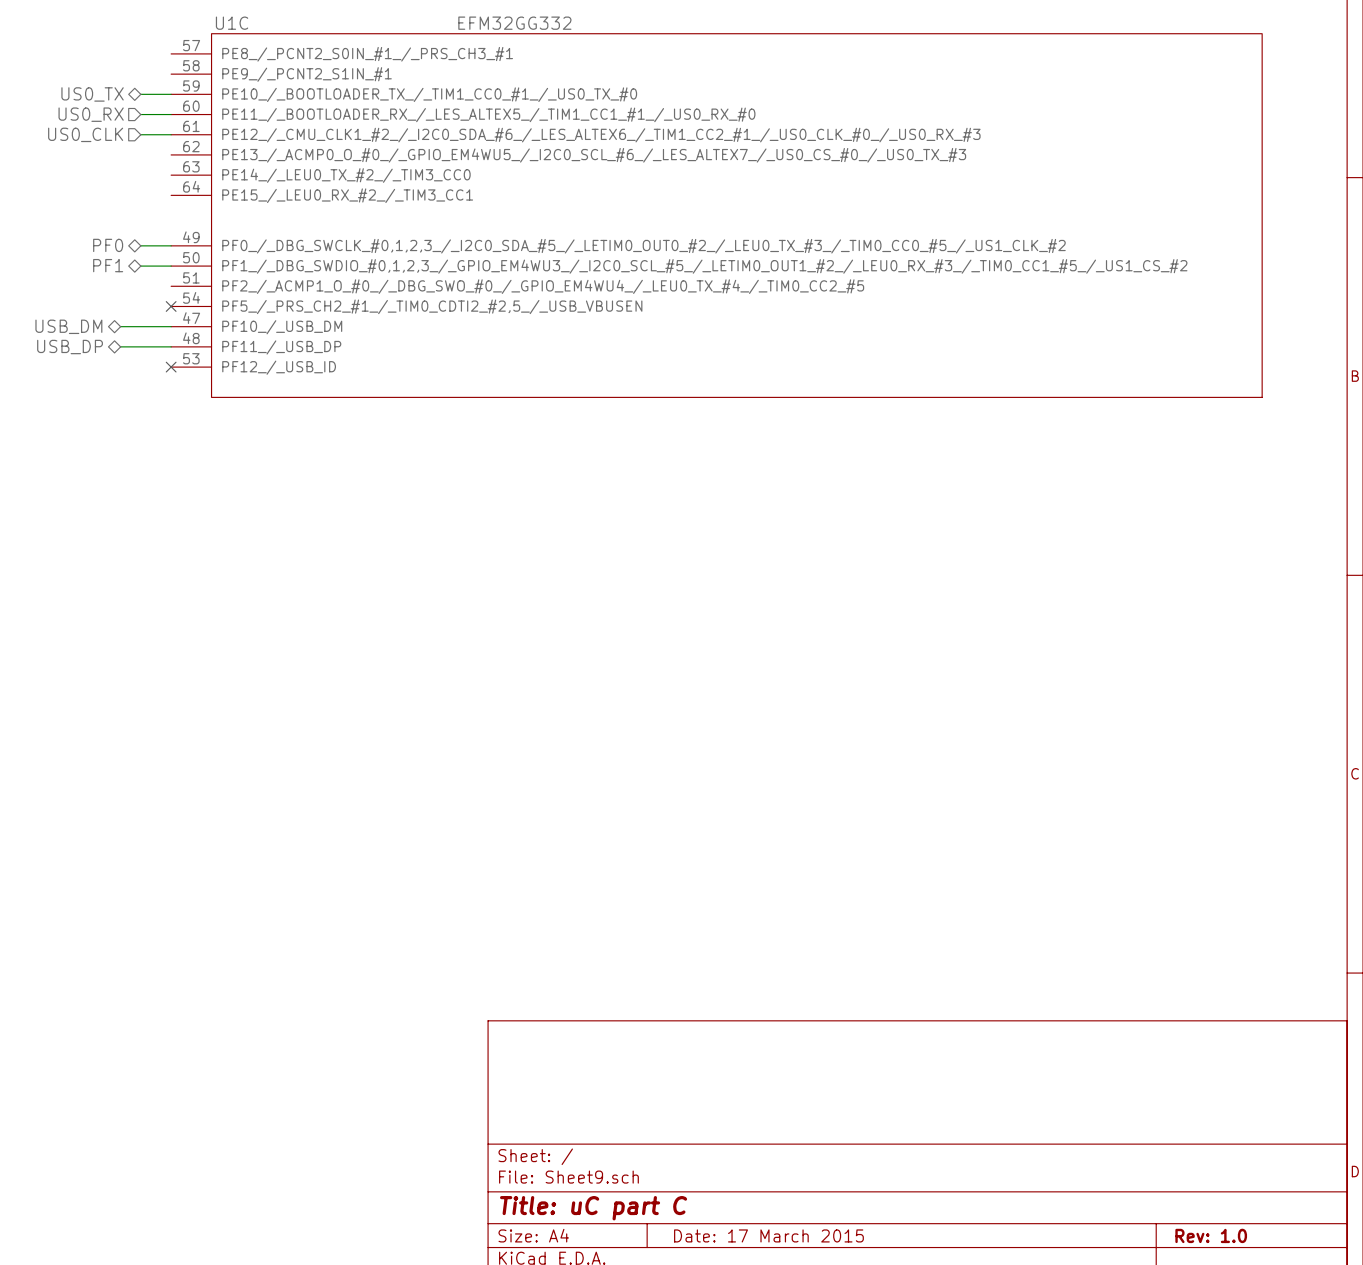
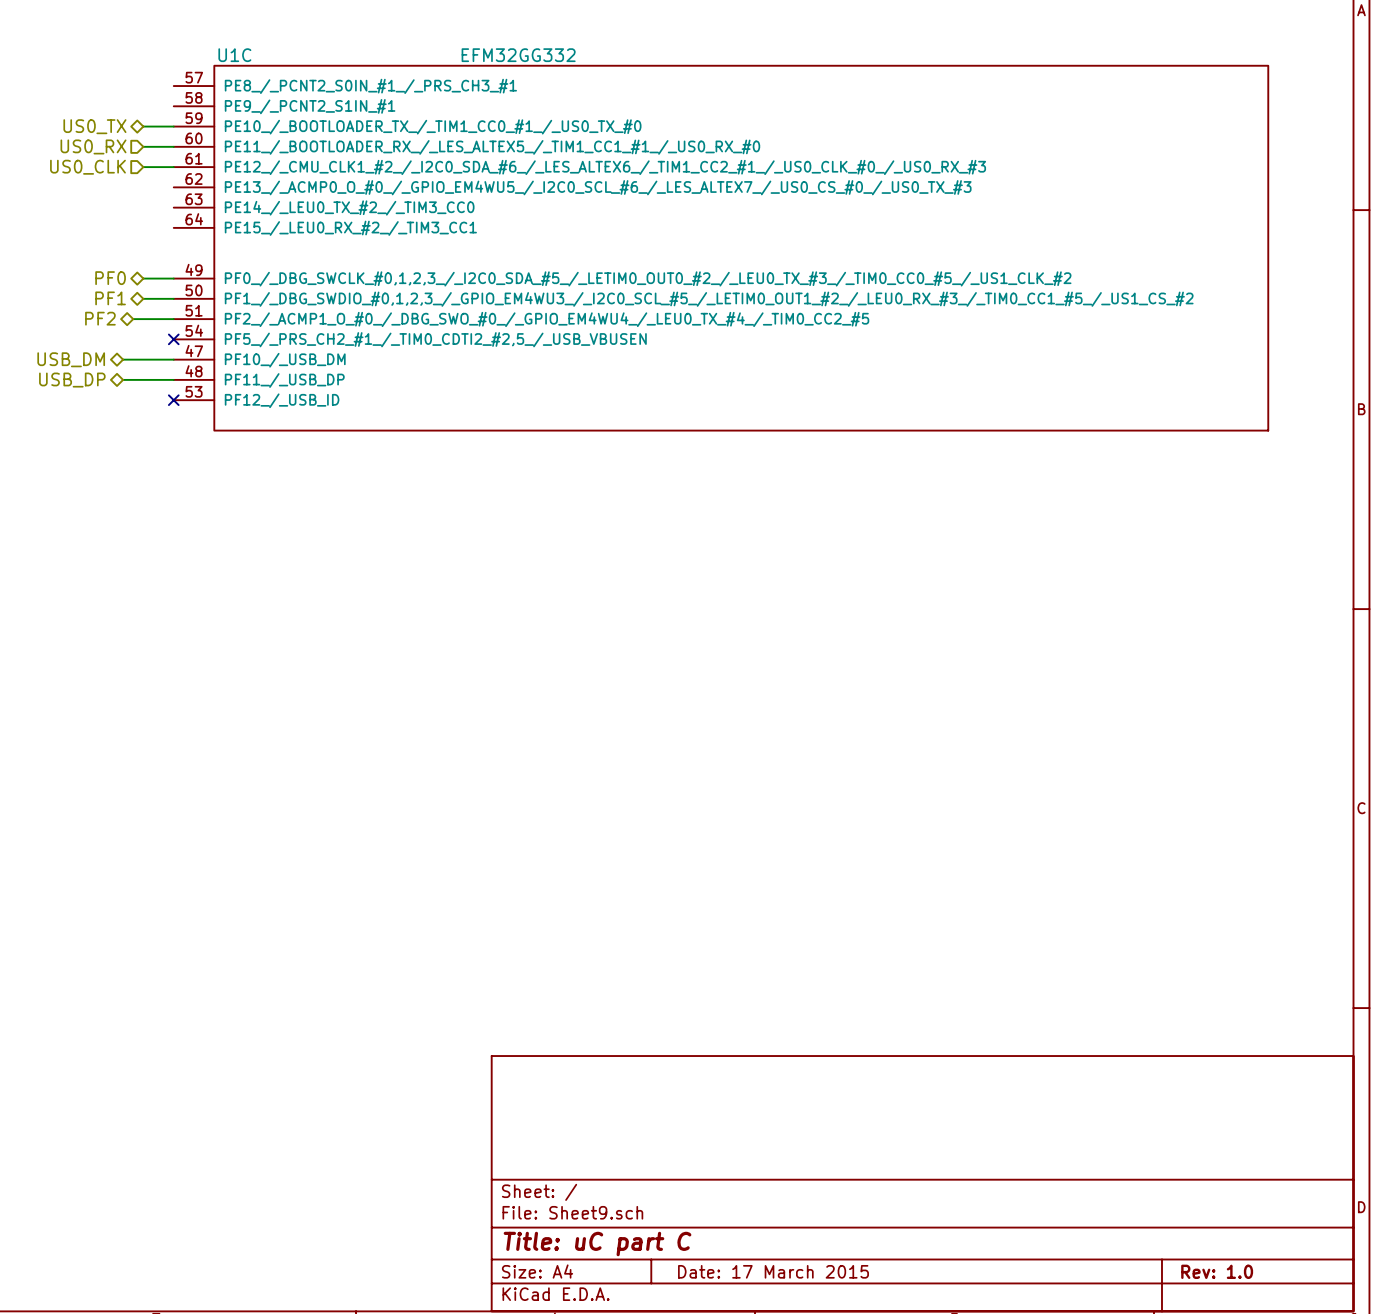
hierarchical label: none -> PF2 (100, 318)
wire: none -> (133, 319) (173, 319)

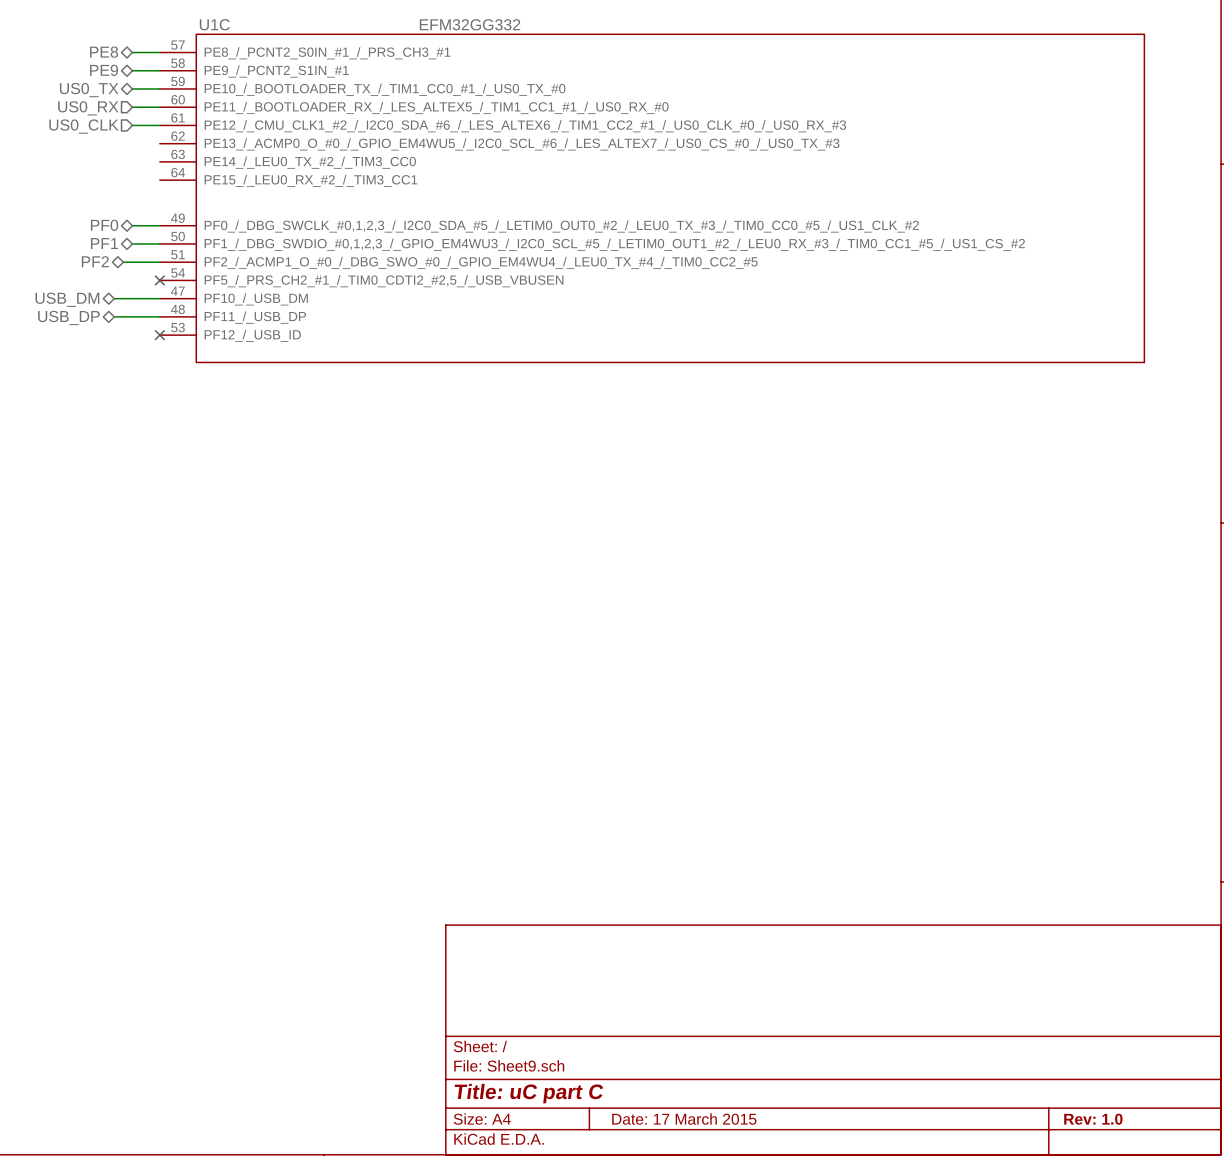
hierarchical label: none -> PE8 (104, 52)
wire: none -> (132, 52) (159, 52)
hierarchical label: none -> PE9 (104, 70)
wire: none -> (132, 70) (159, 70)

